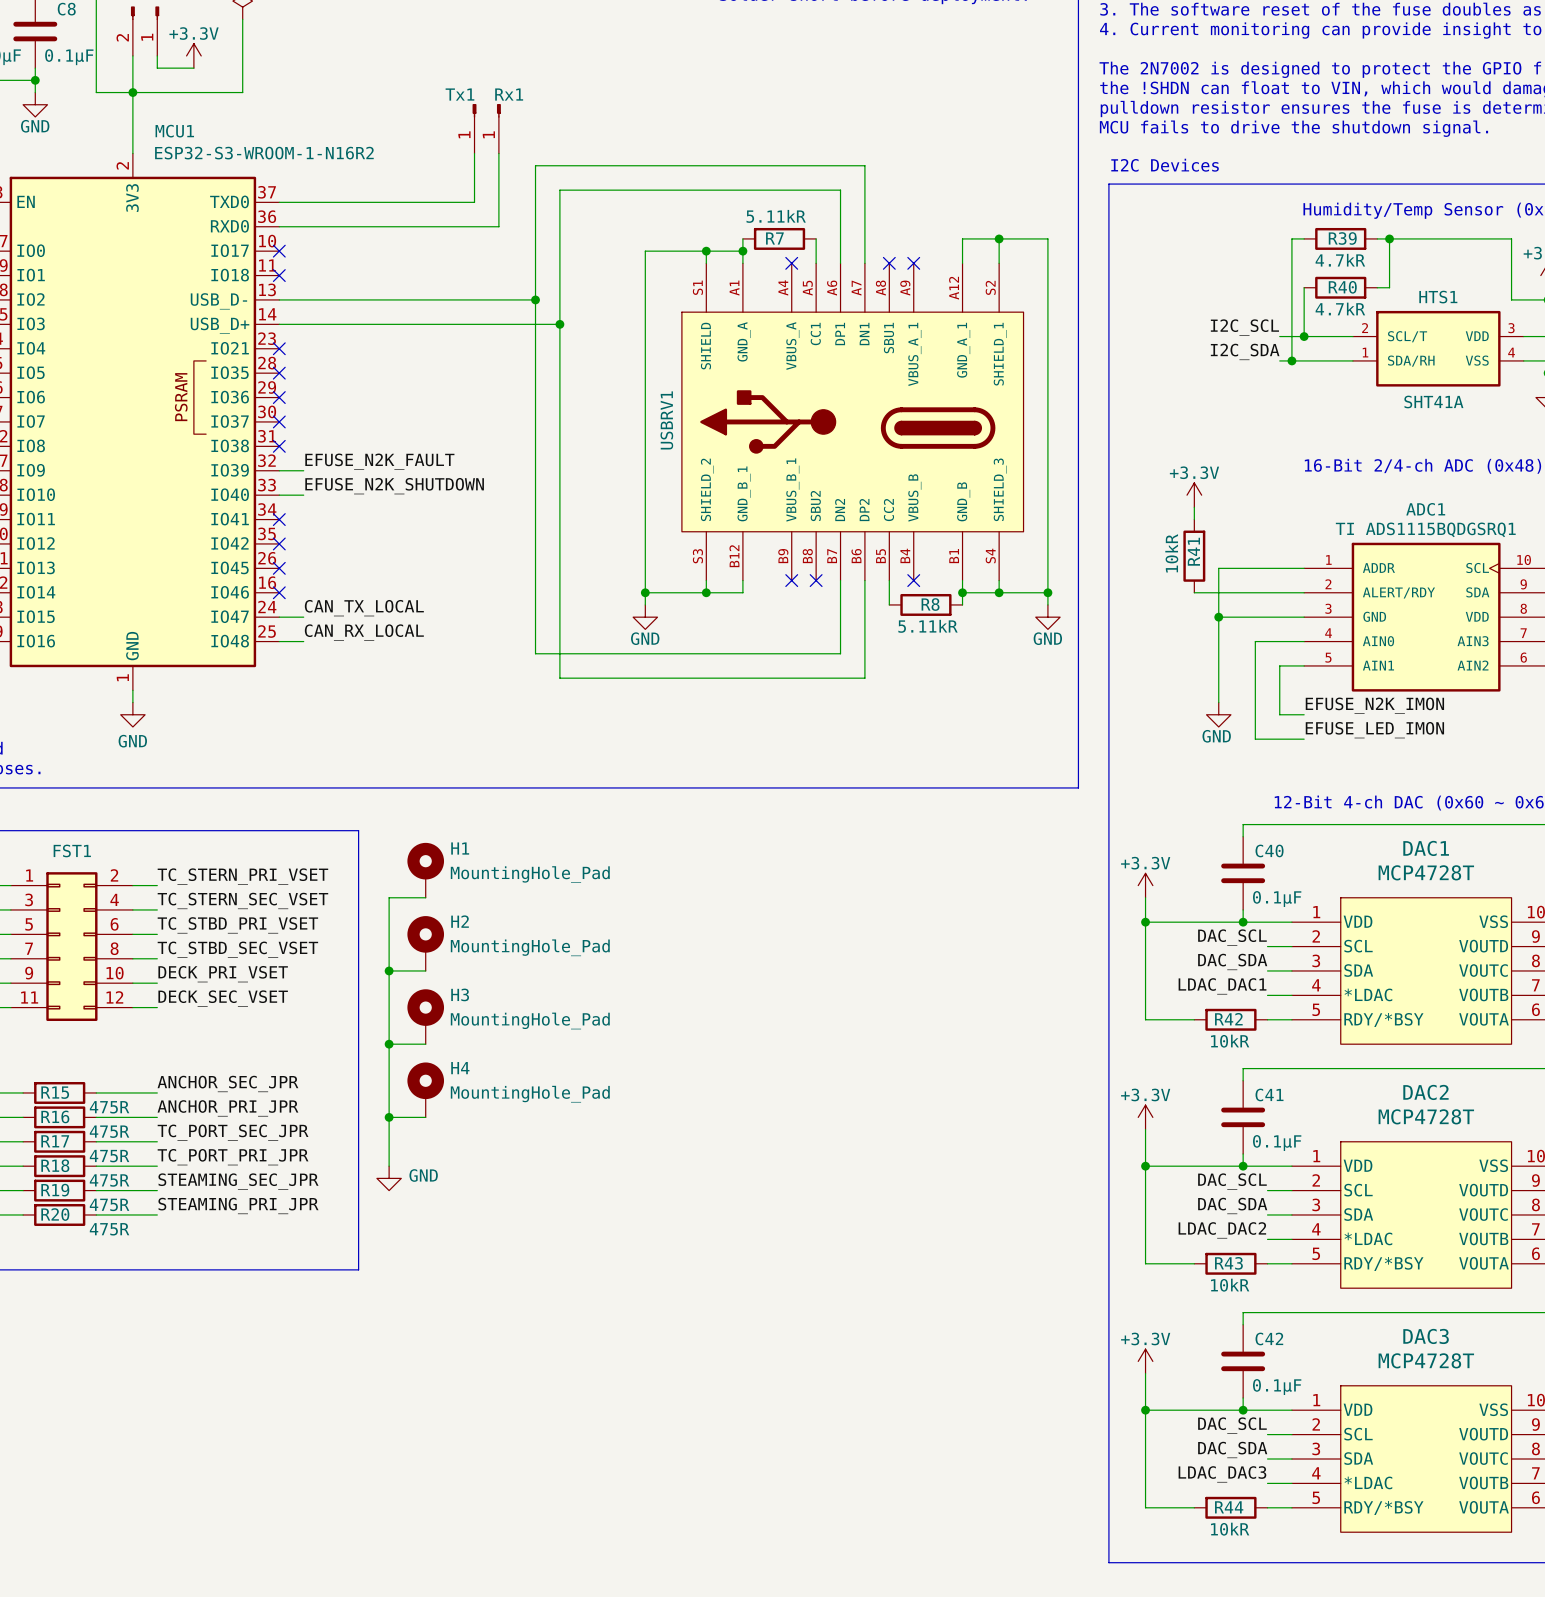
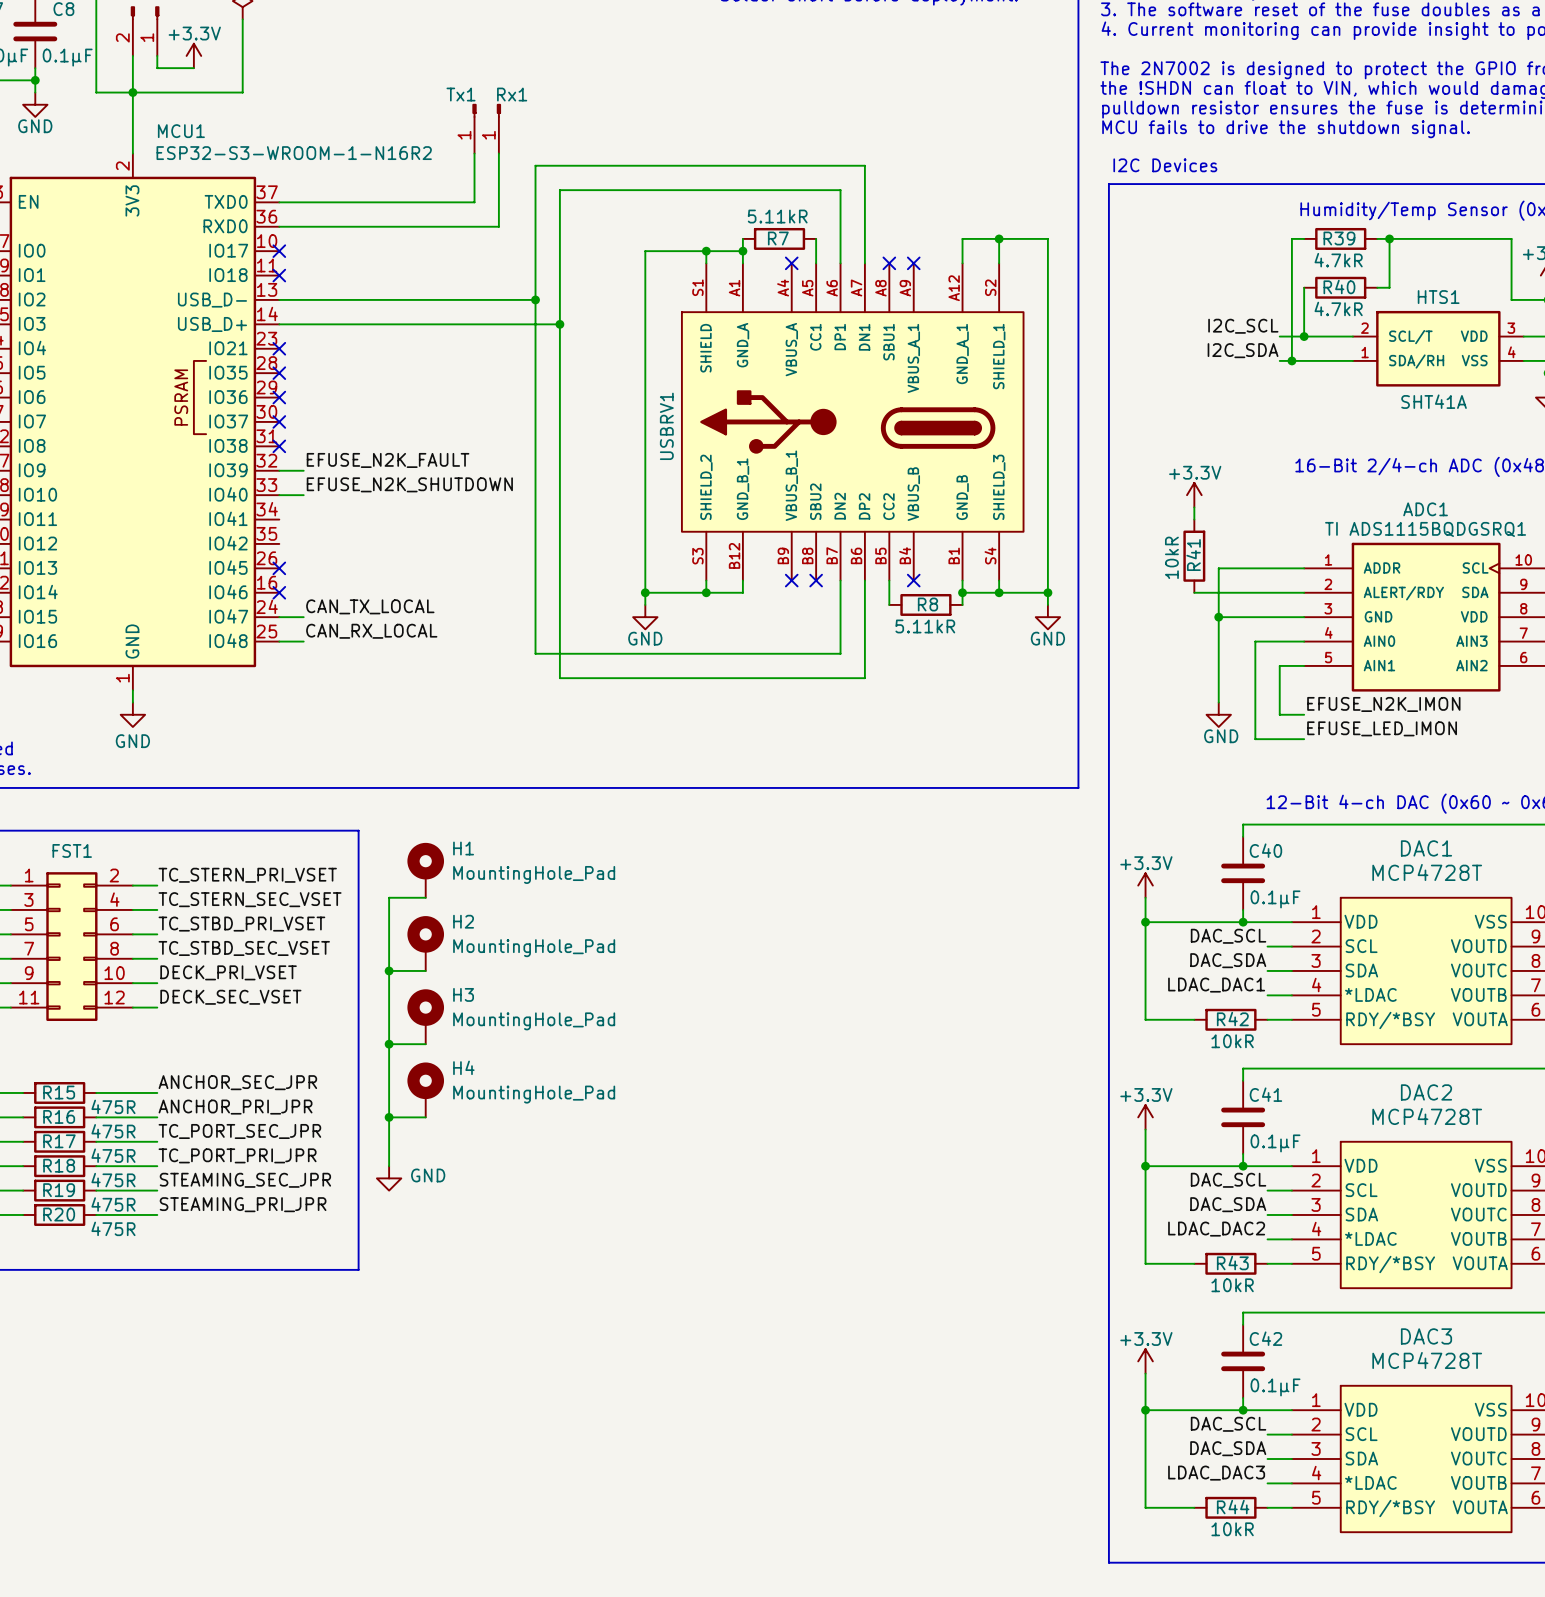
no-connect mark: (279, 519) -> none
no-connect mark: (279, 543) -> none

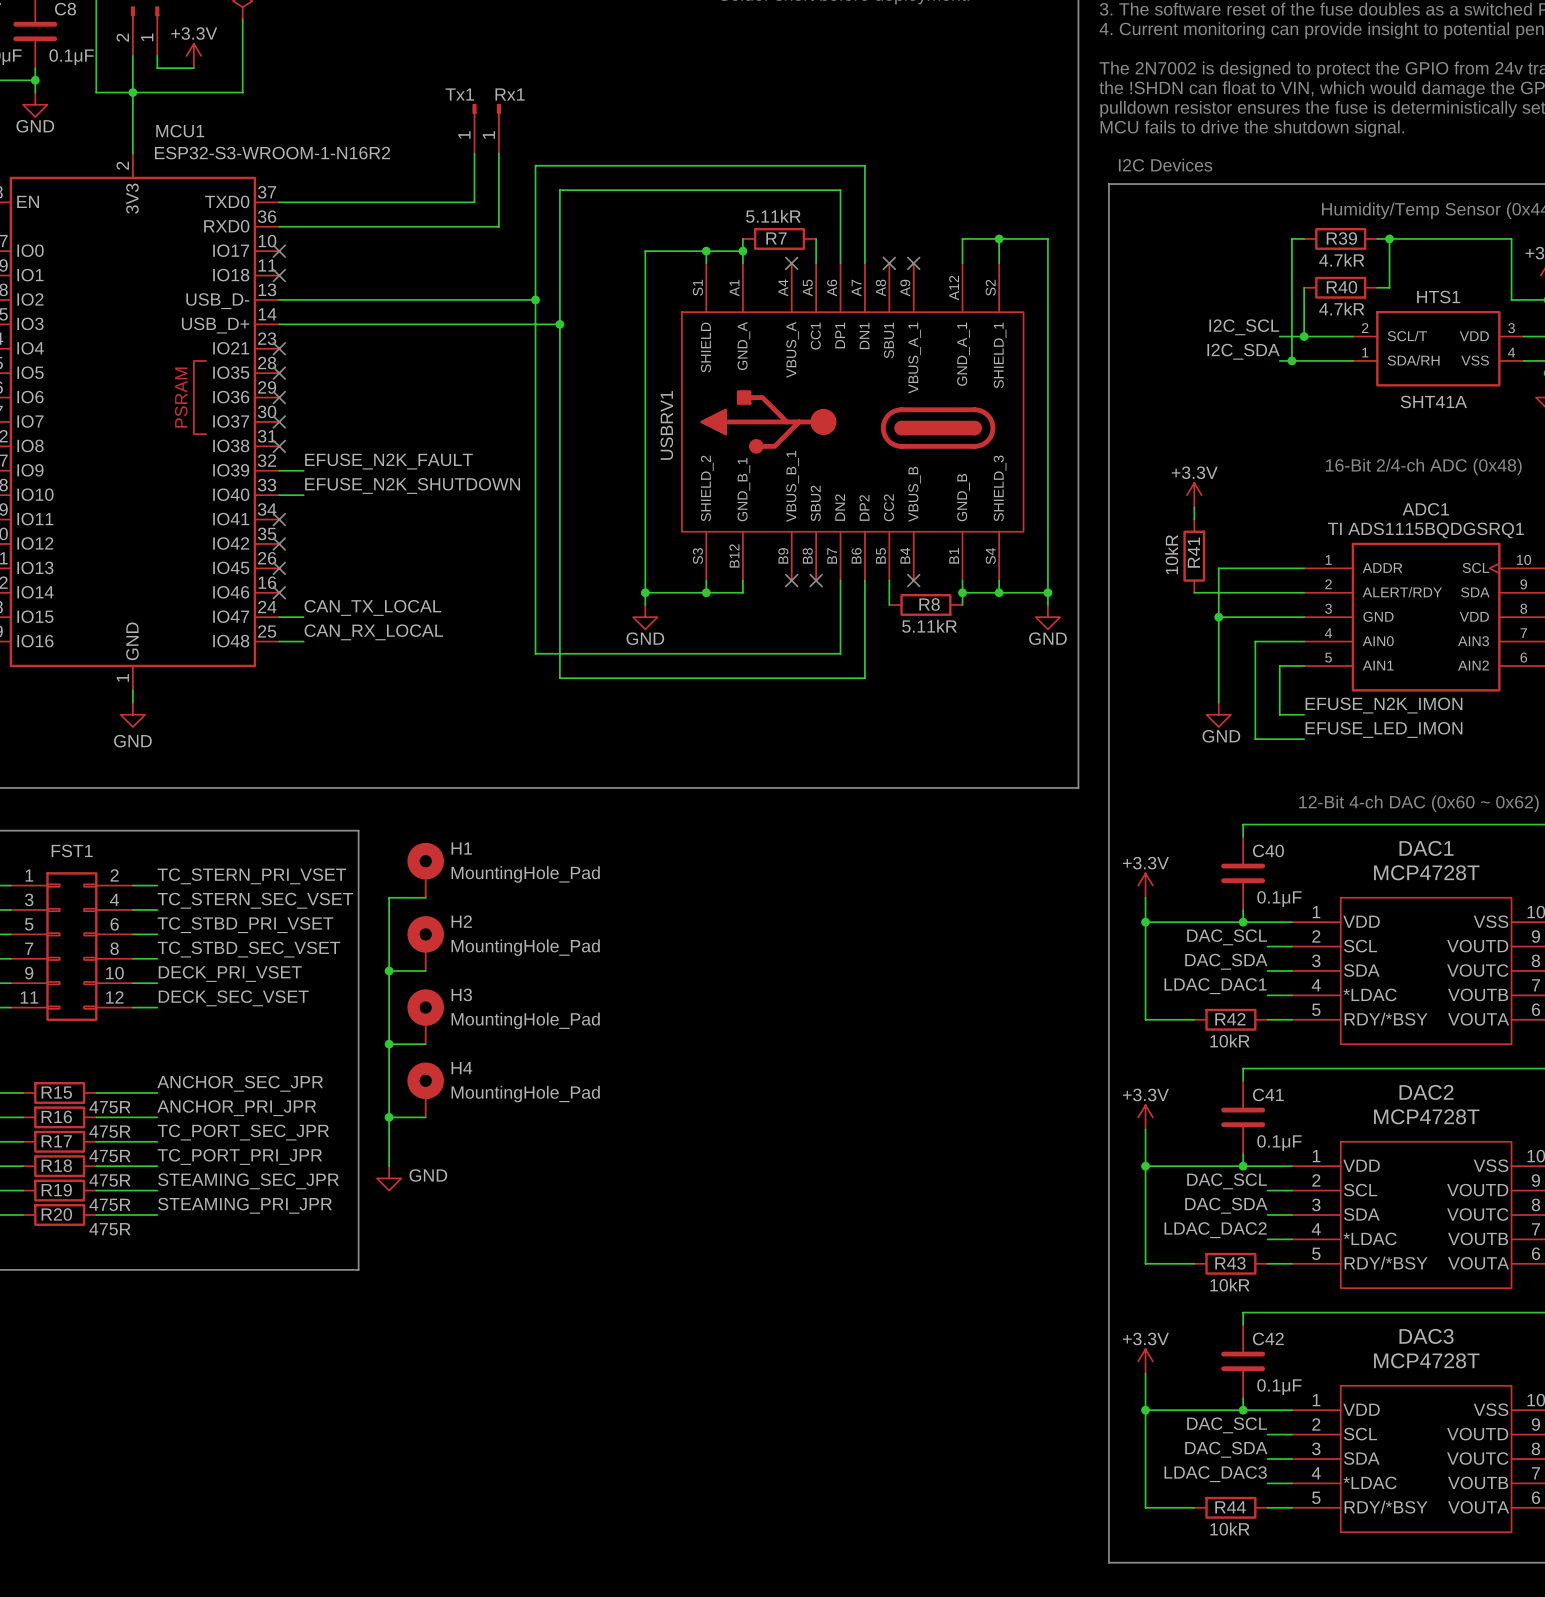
no-connect mark: none -> (279, 519)
no-connect mark: none -> (279, 543)

